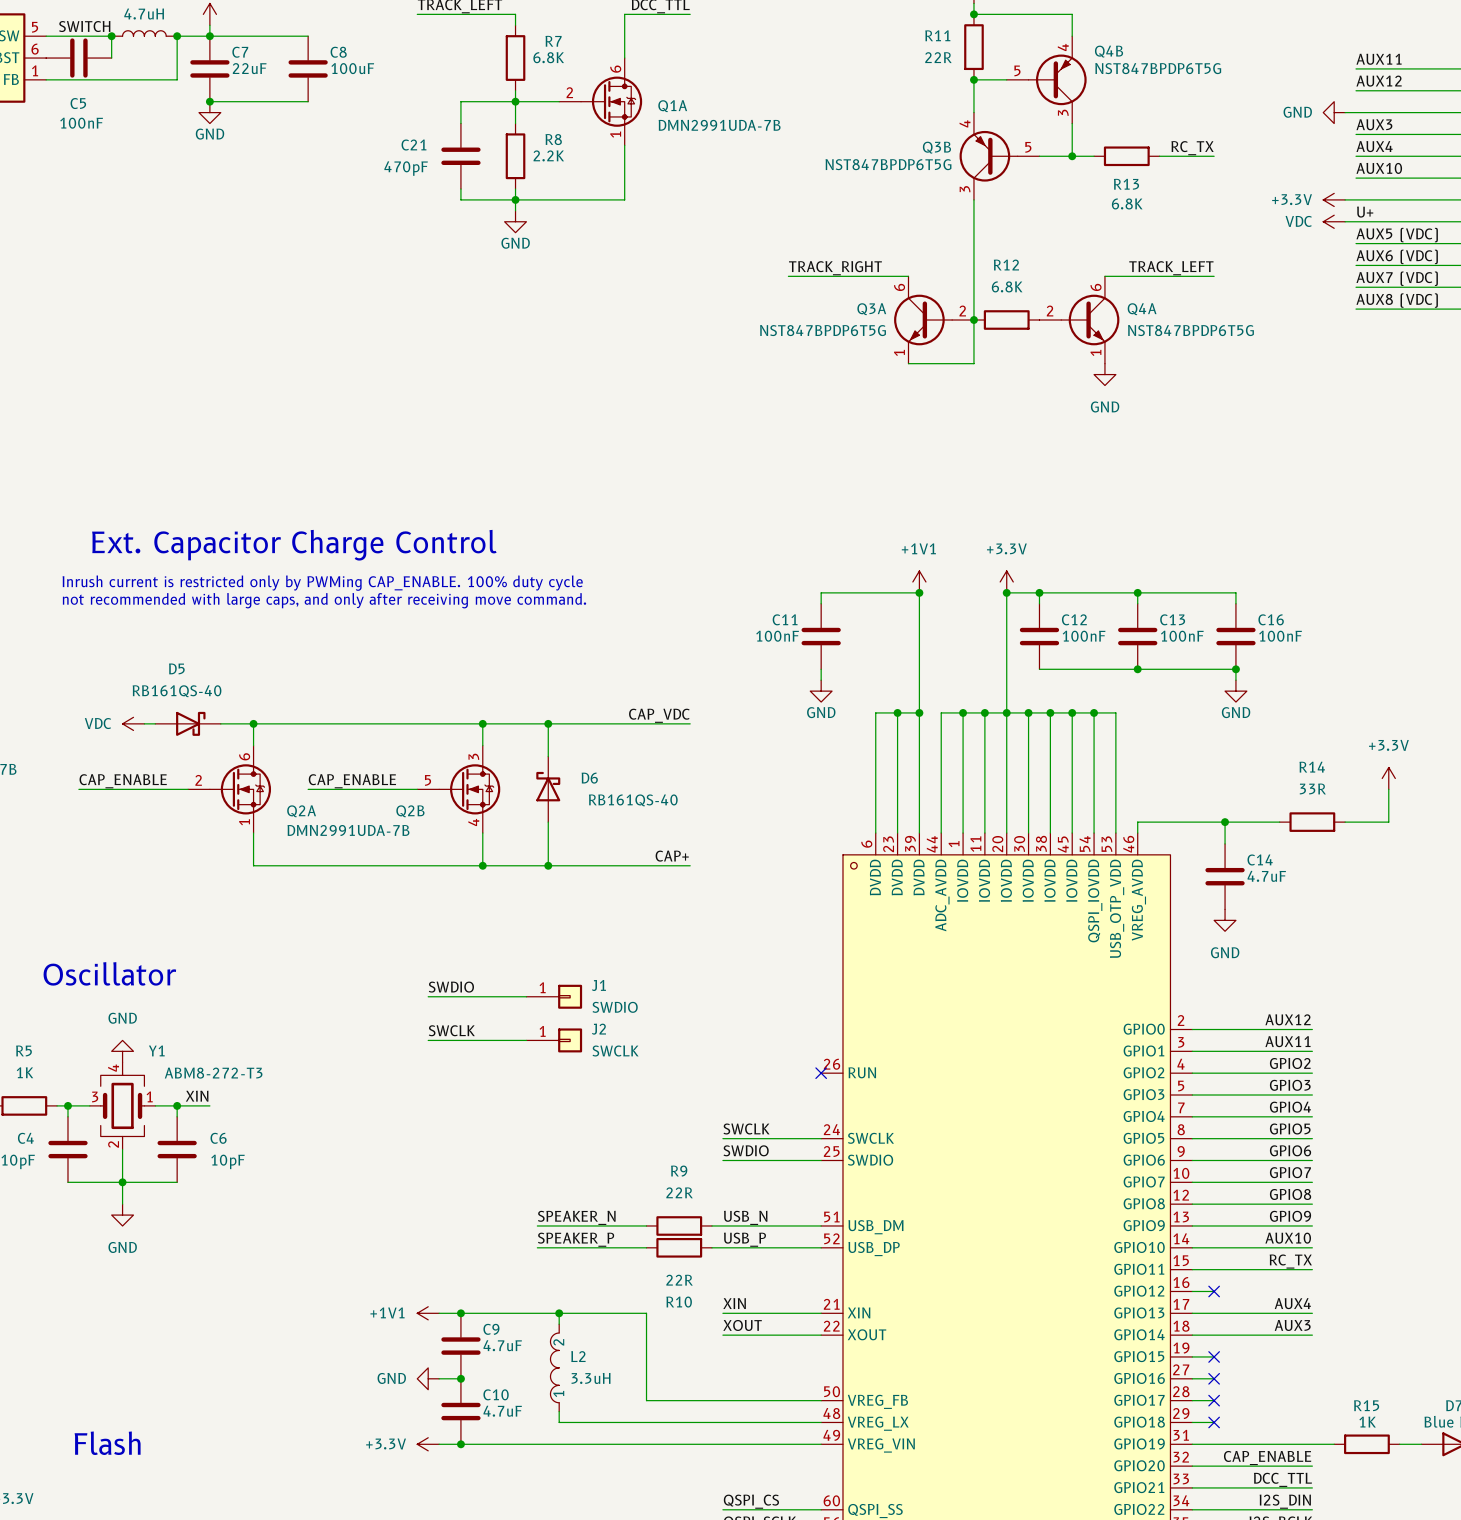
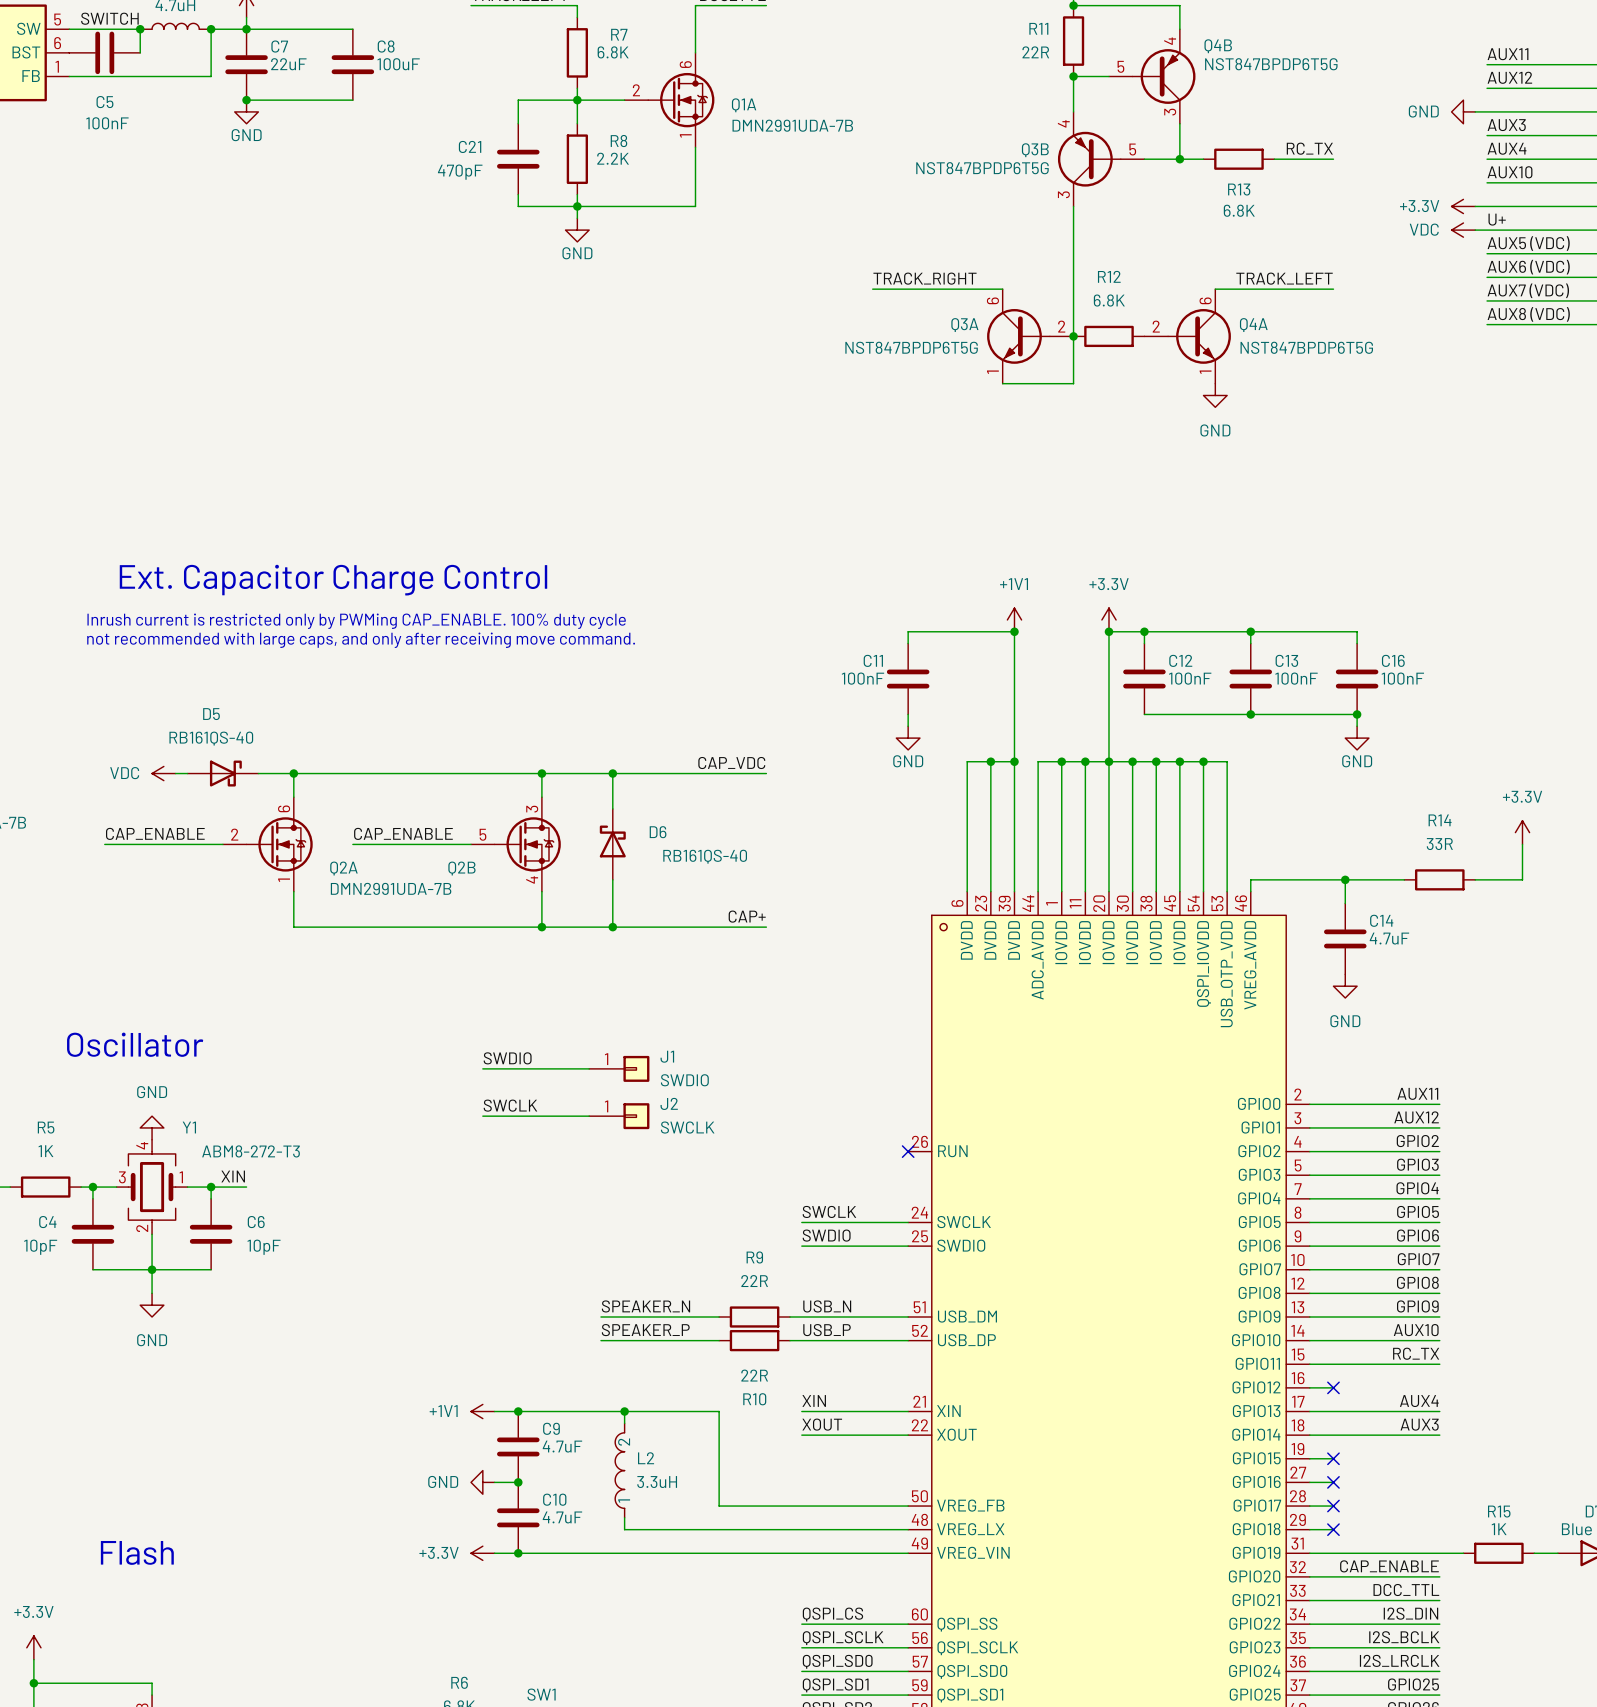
label: AUX12 (1288, 1019) -> AUX11 (1417, 1093)
label: AUX11 (1287, 1041) -> AUX12 (1416, 1117)

